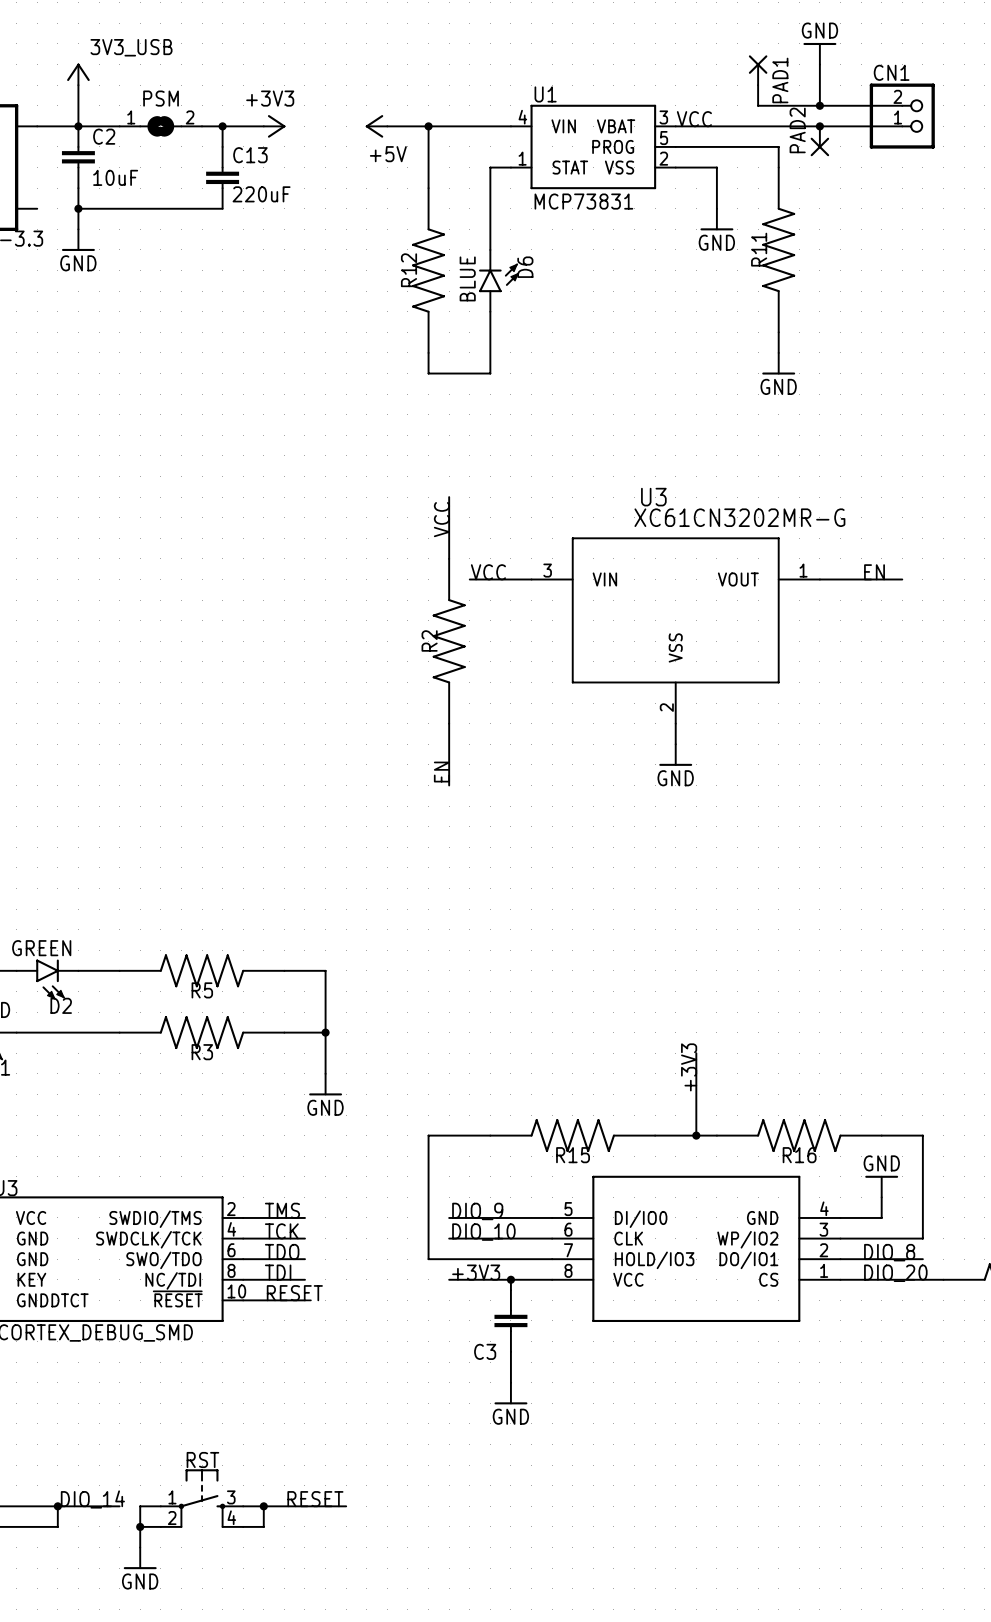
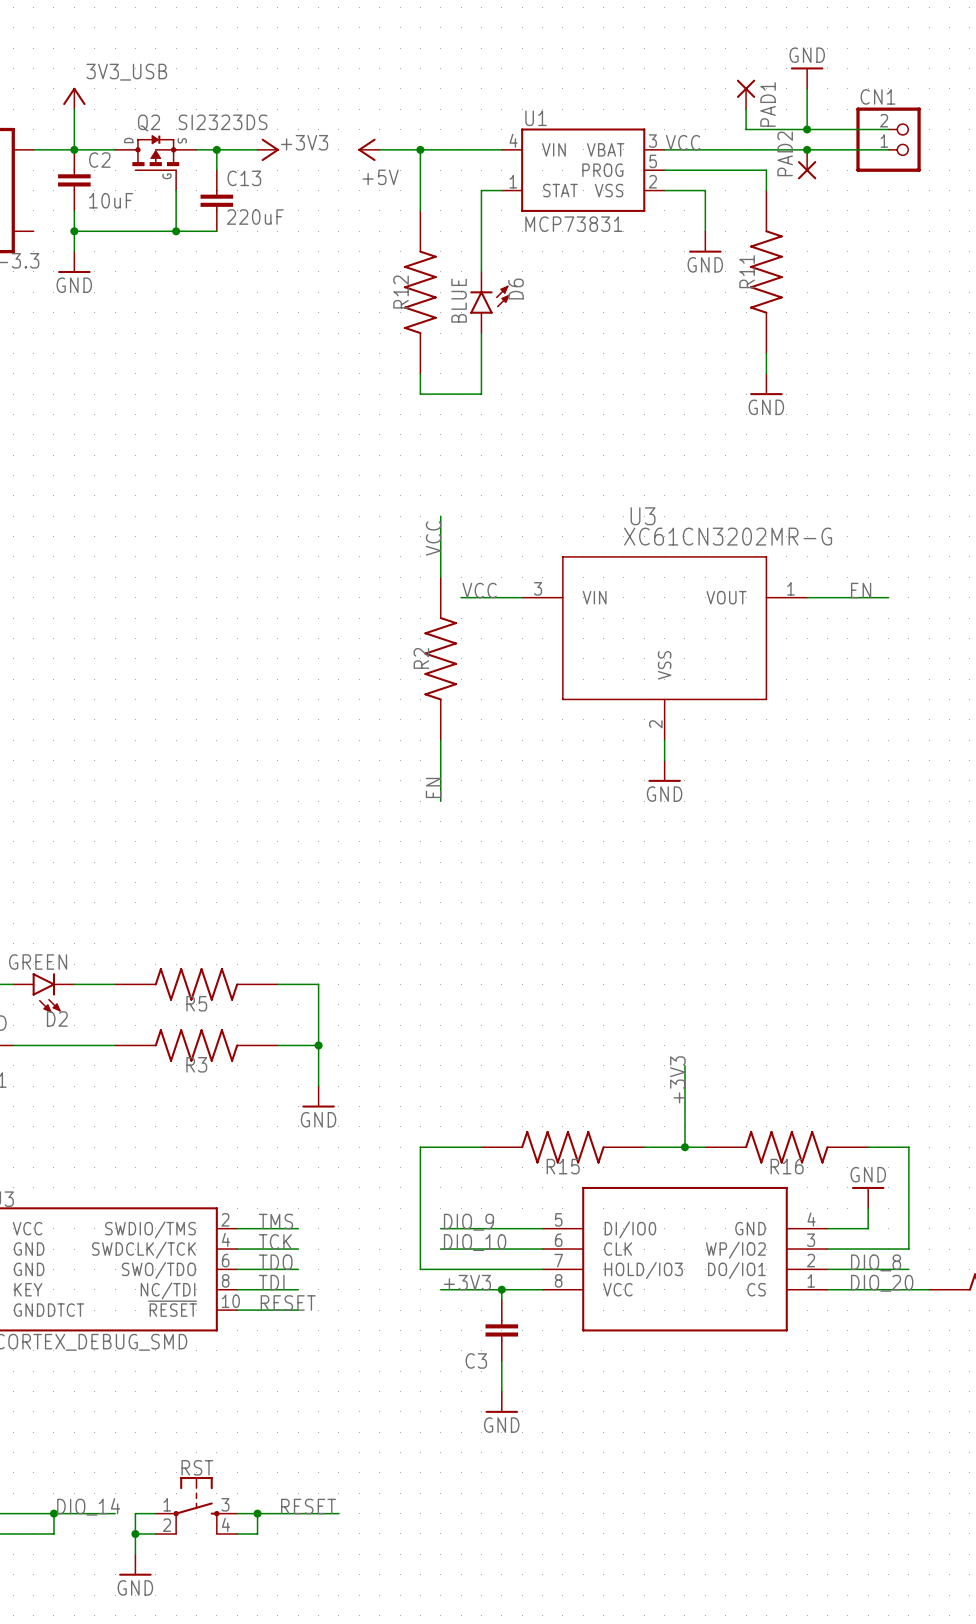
power symbol text position: +3V3 (270, 98) -> +3V3 (304, 142)
PSM: (160, 126) -> none
Q2: none -> SI2323DS (155, 162)
wire: none -> (176, 190) (176, 231)
junction: none -> (176, 231)

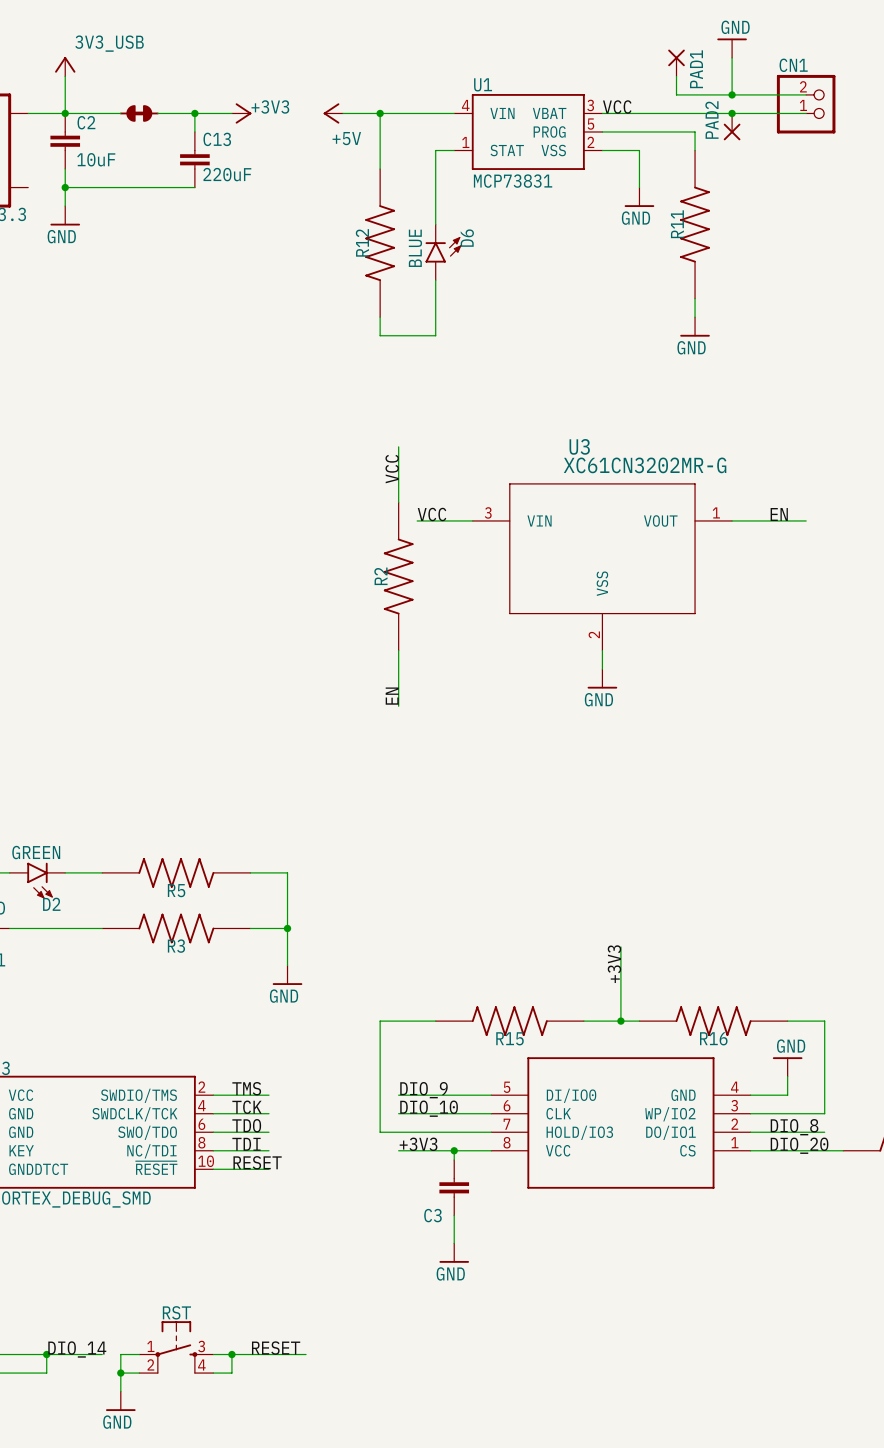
part: none -> (139, 113)
Q2: SI2323DS (155, 162) -> none
wire: (176, 190) (176, 231) -> none
junction: (176, 231) -> none

